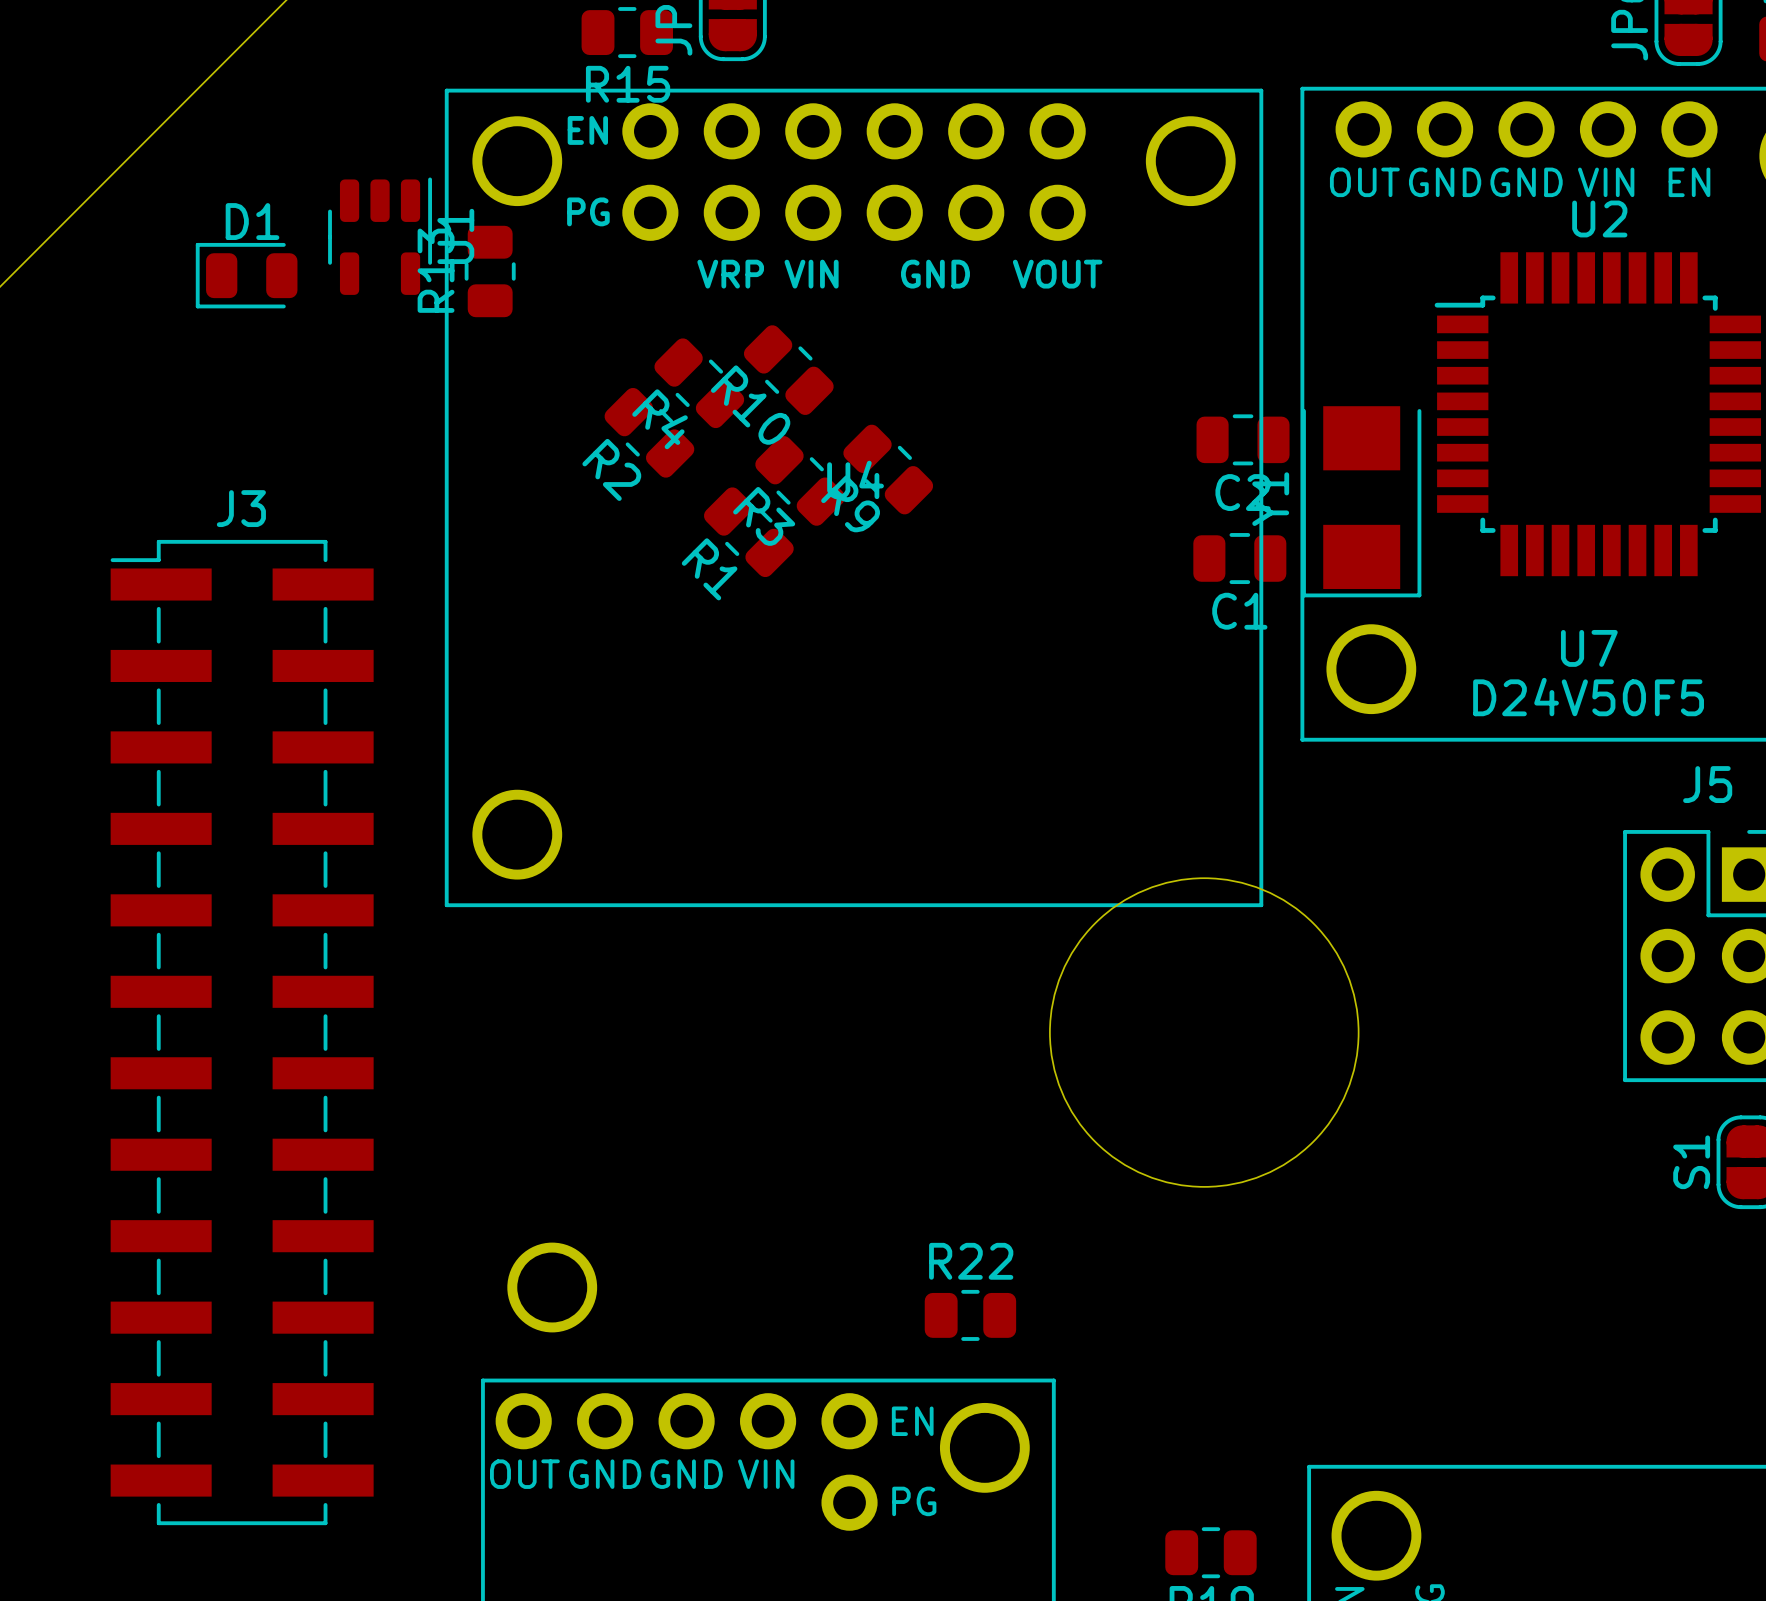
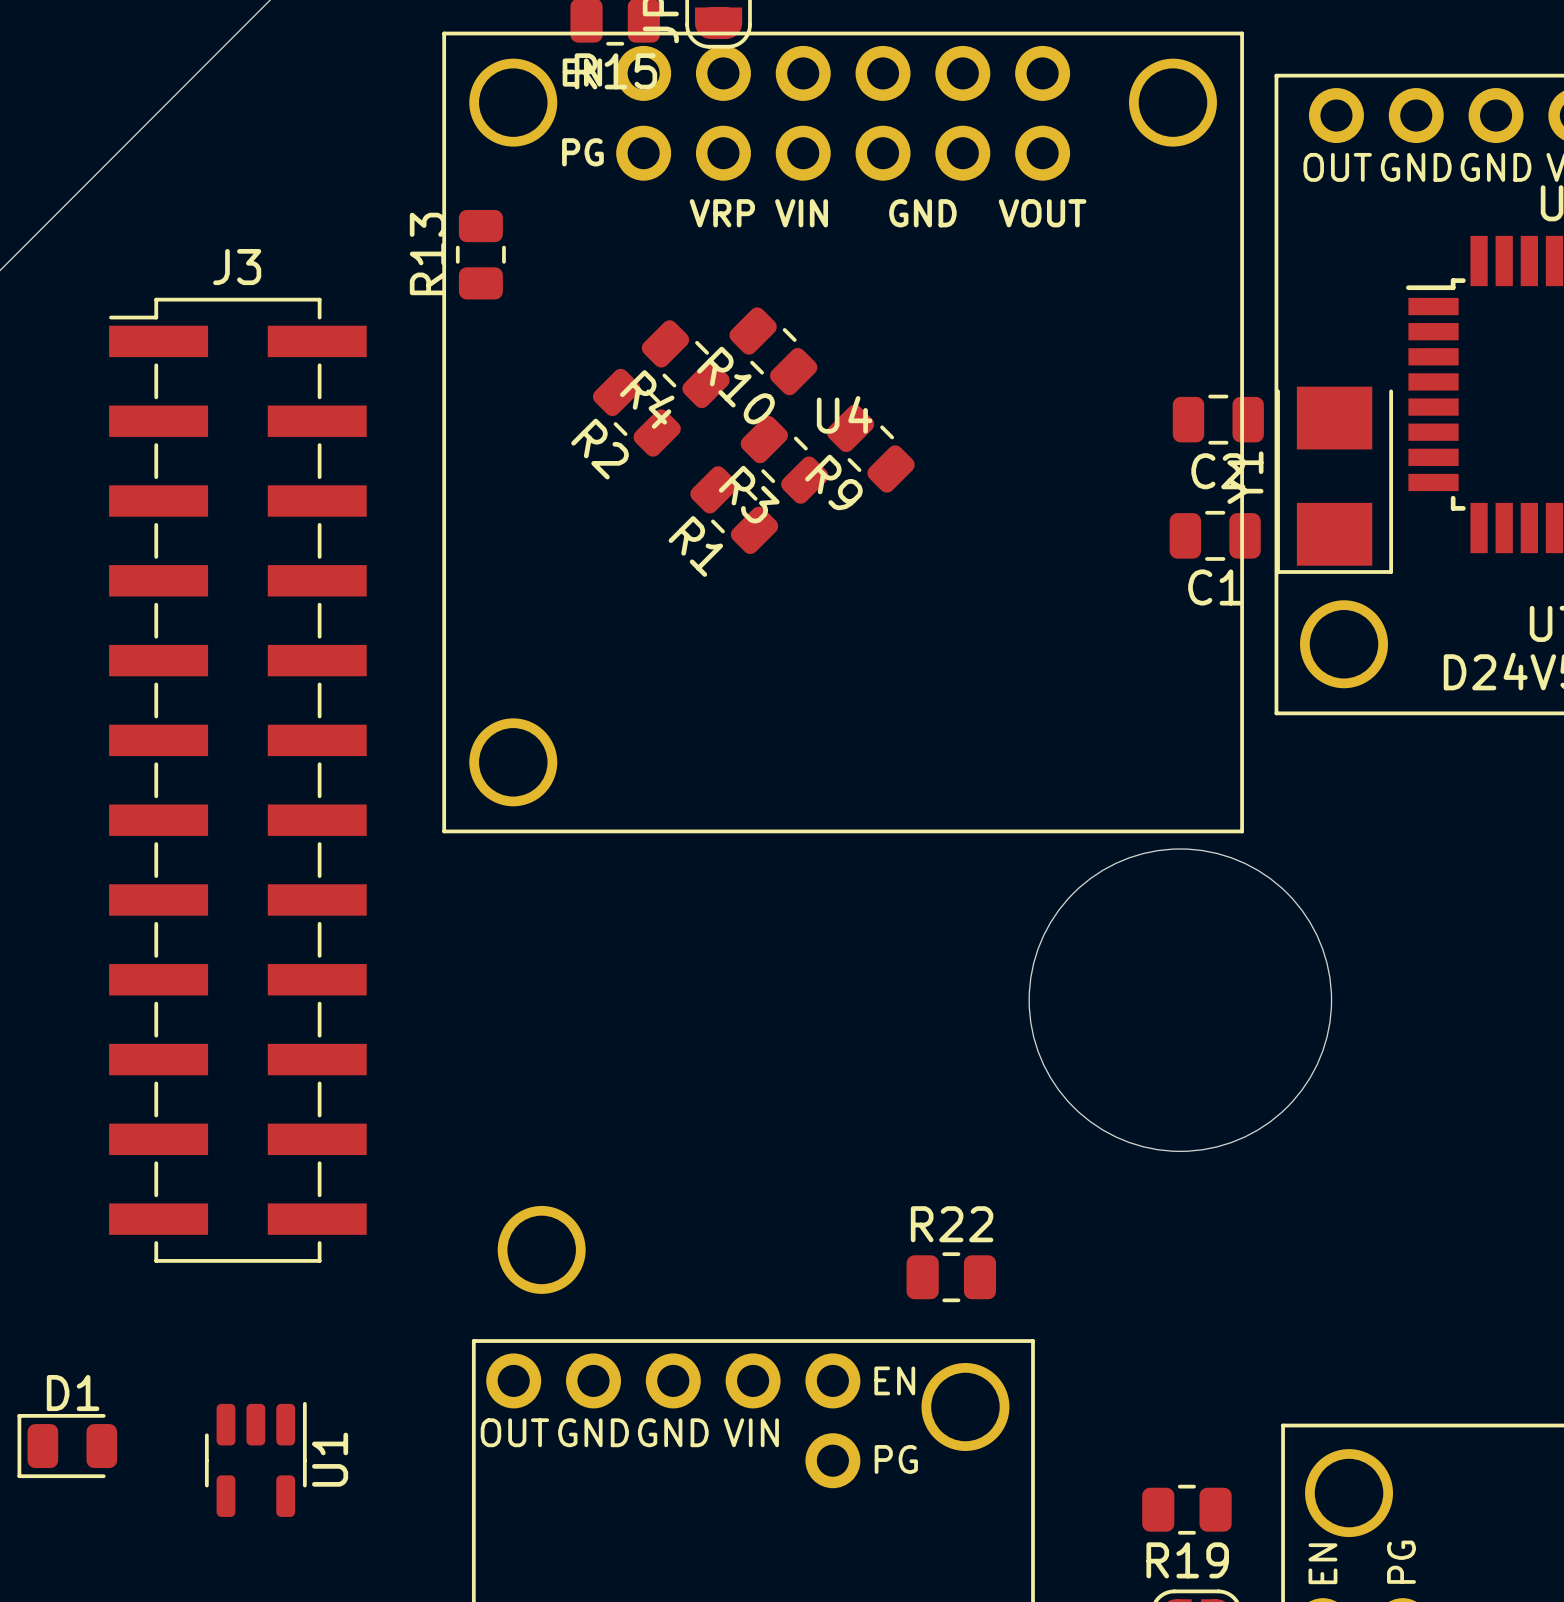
U1 position: (380, 236) -> (255, 1459)
D1 position: (246, 275) -> (67, 1446)
U4 position: (976, 620) -> (962, 552)
J3 position: (242, 1032) -> (237, 780)

